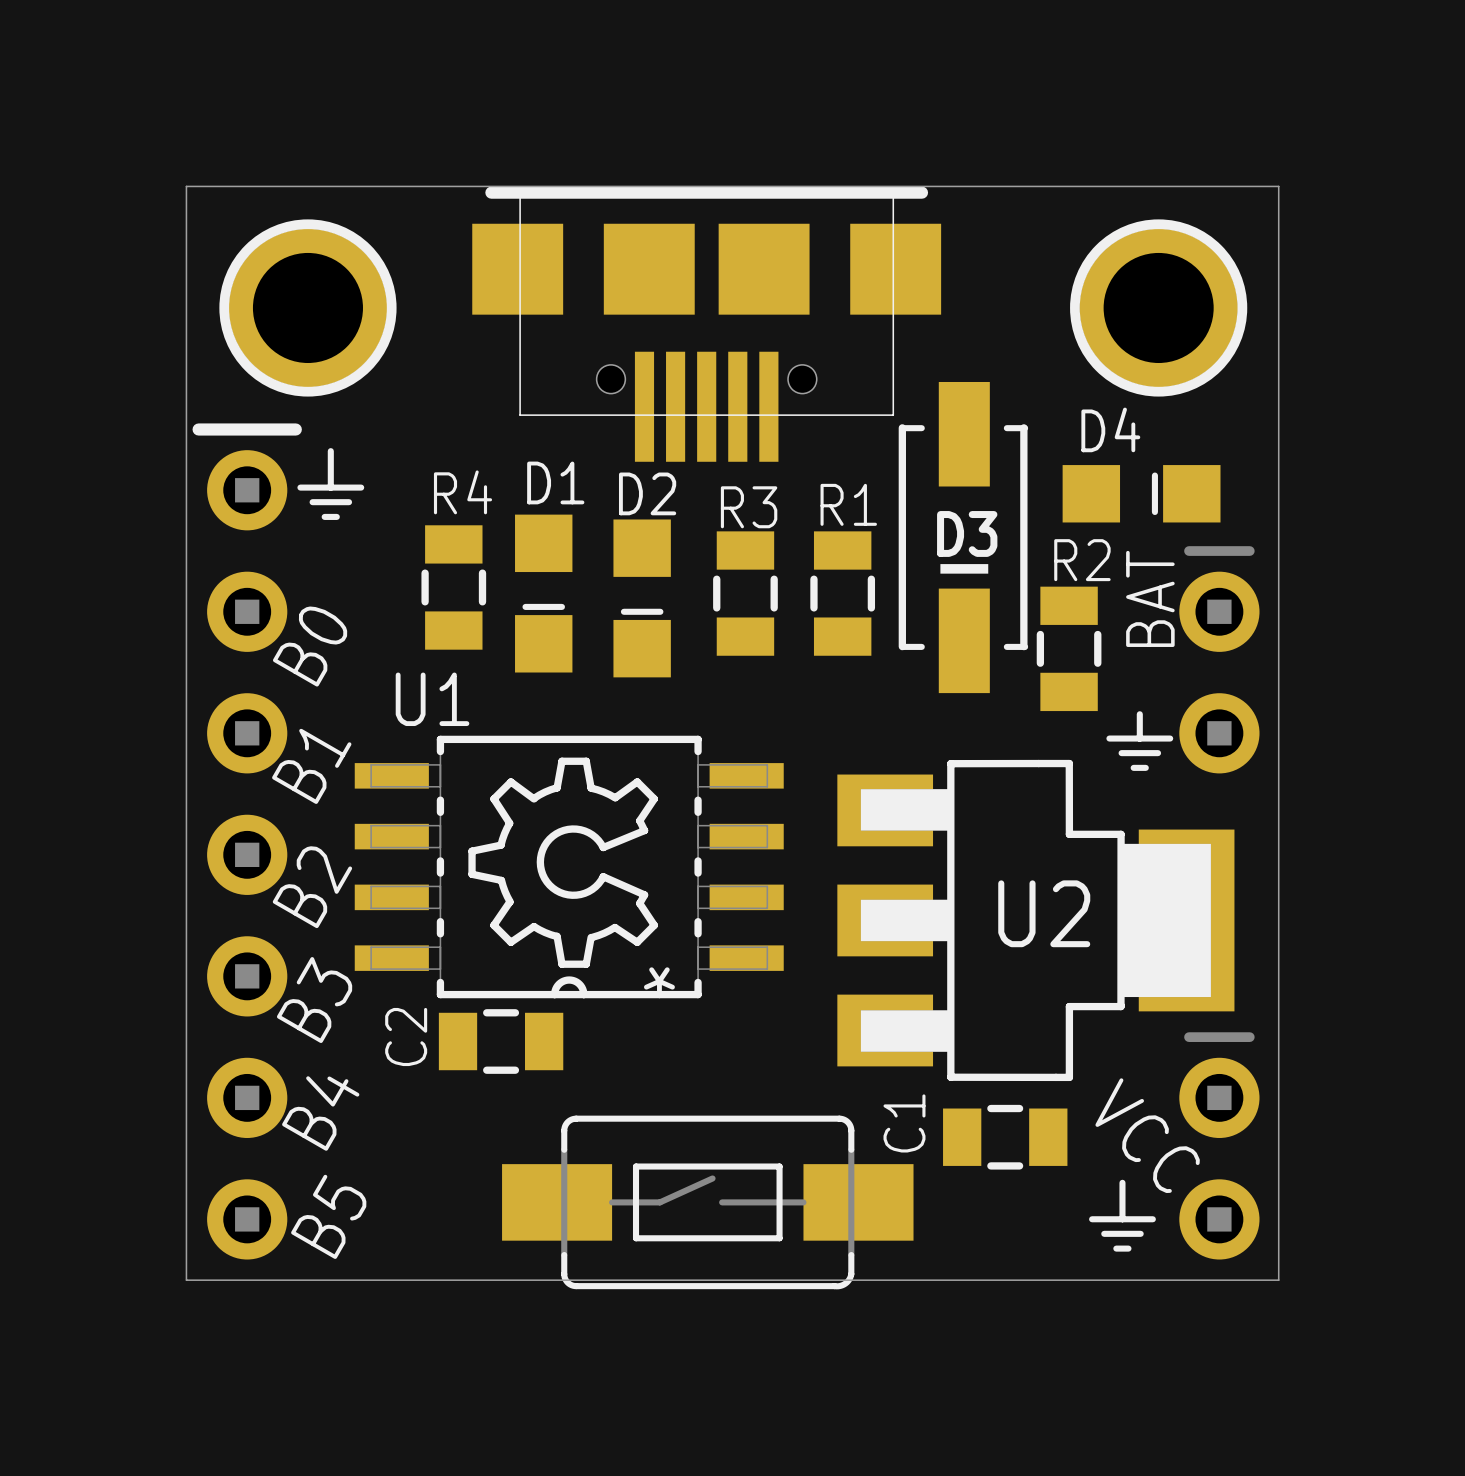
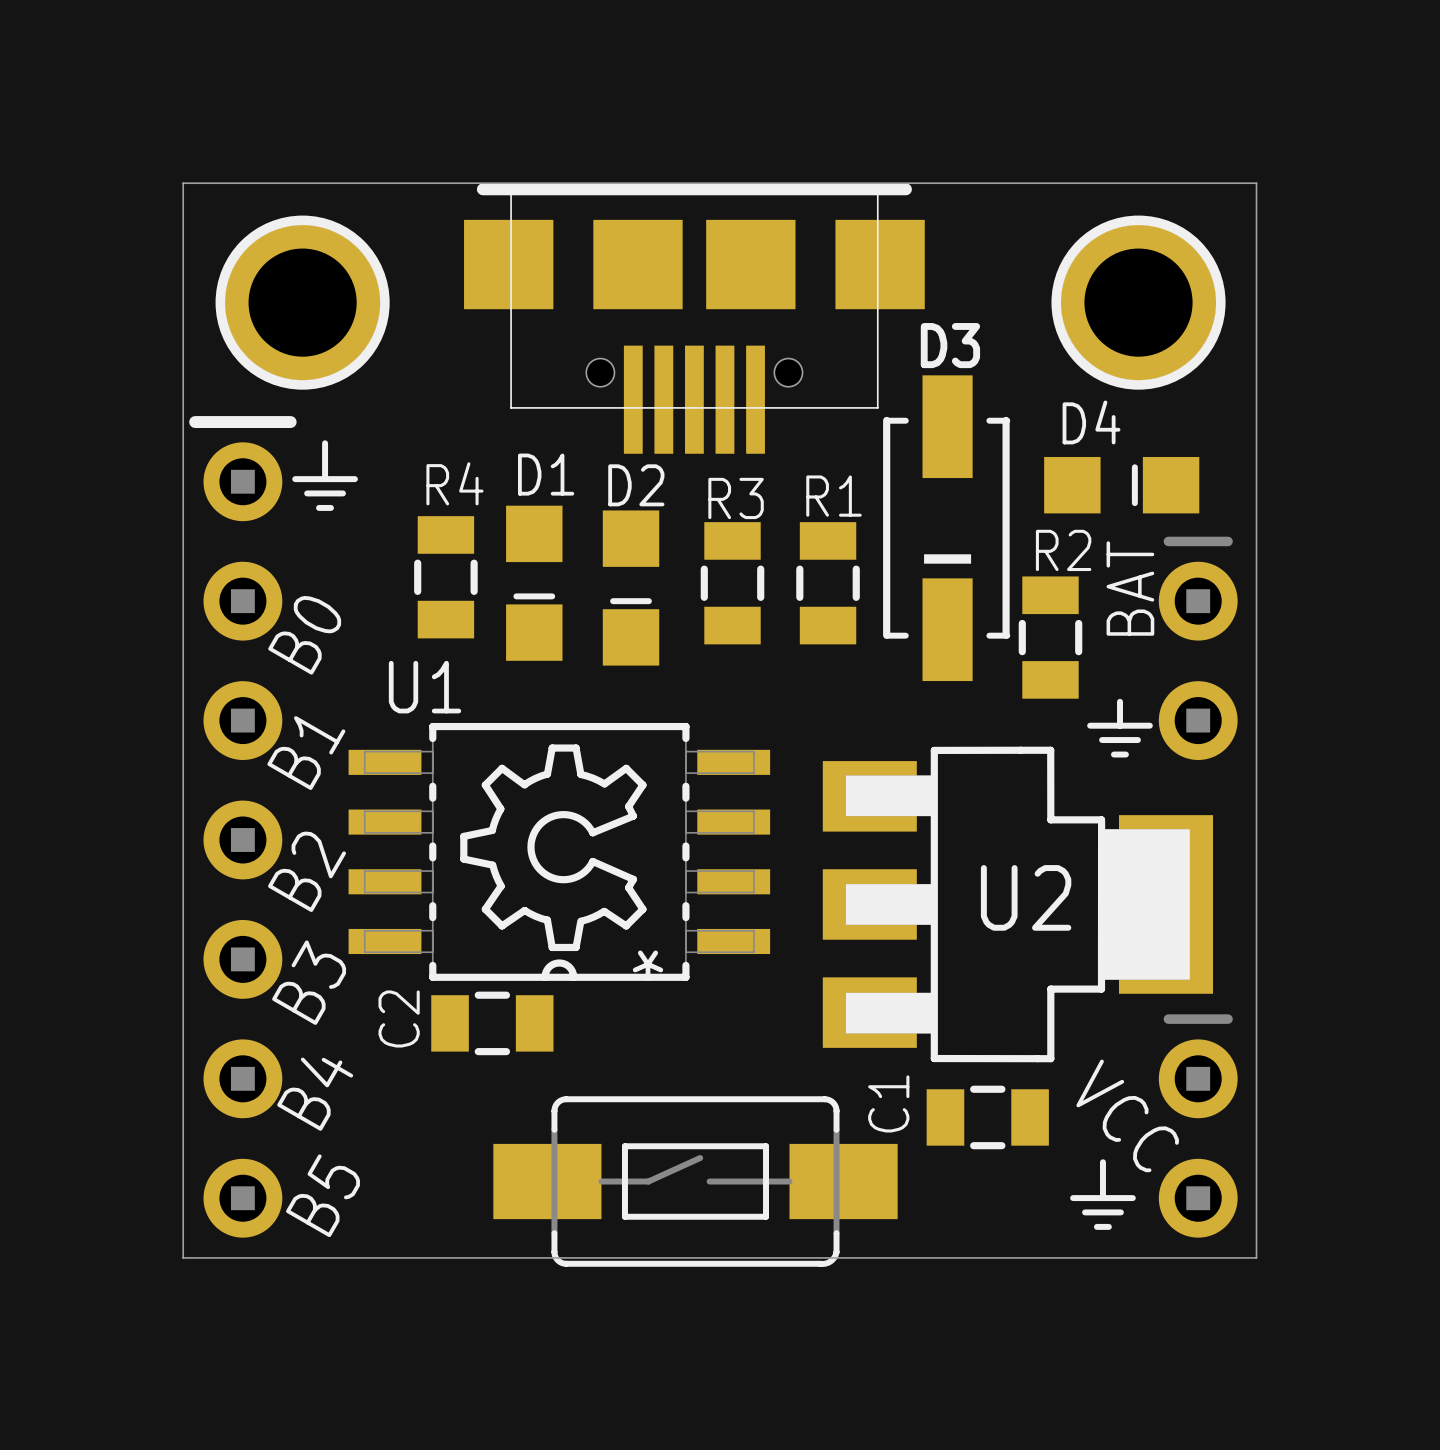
D3 name position: D3 (967, 533) -> D3 (950, 345)

